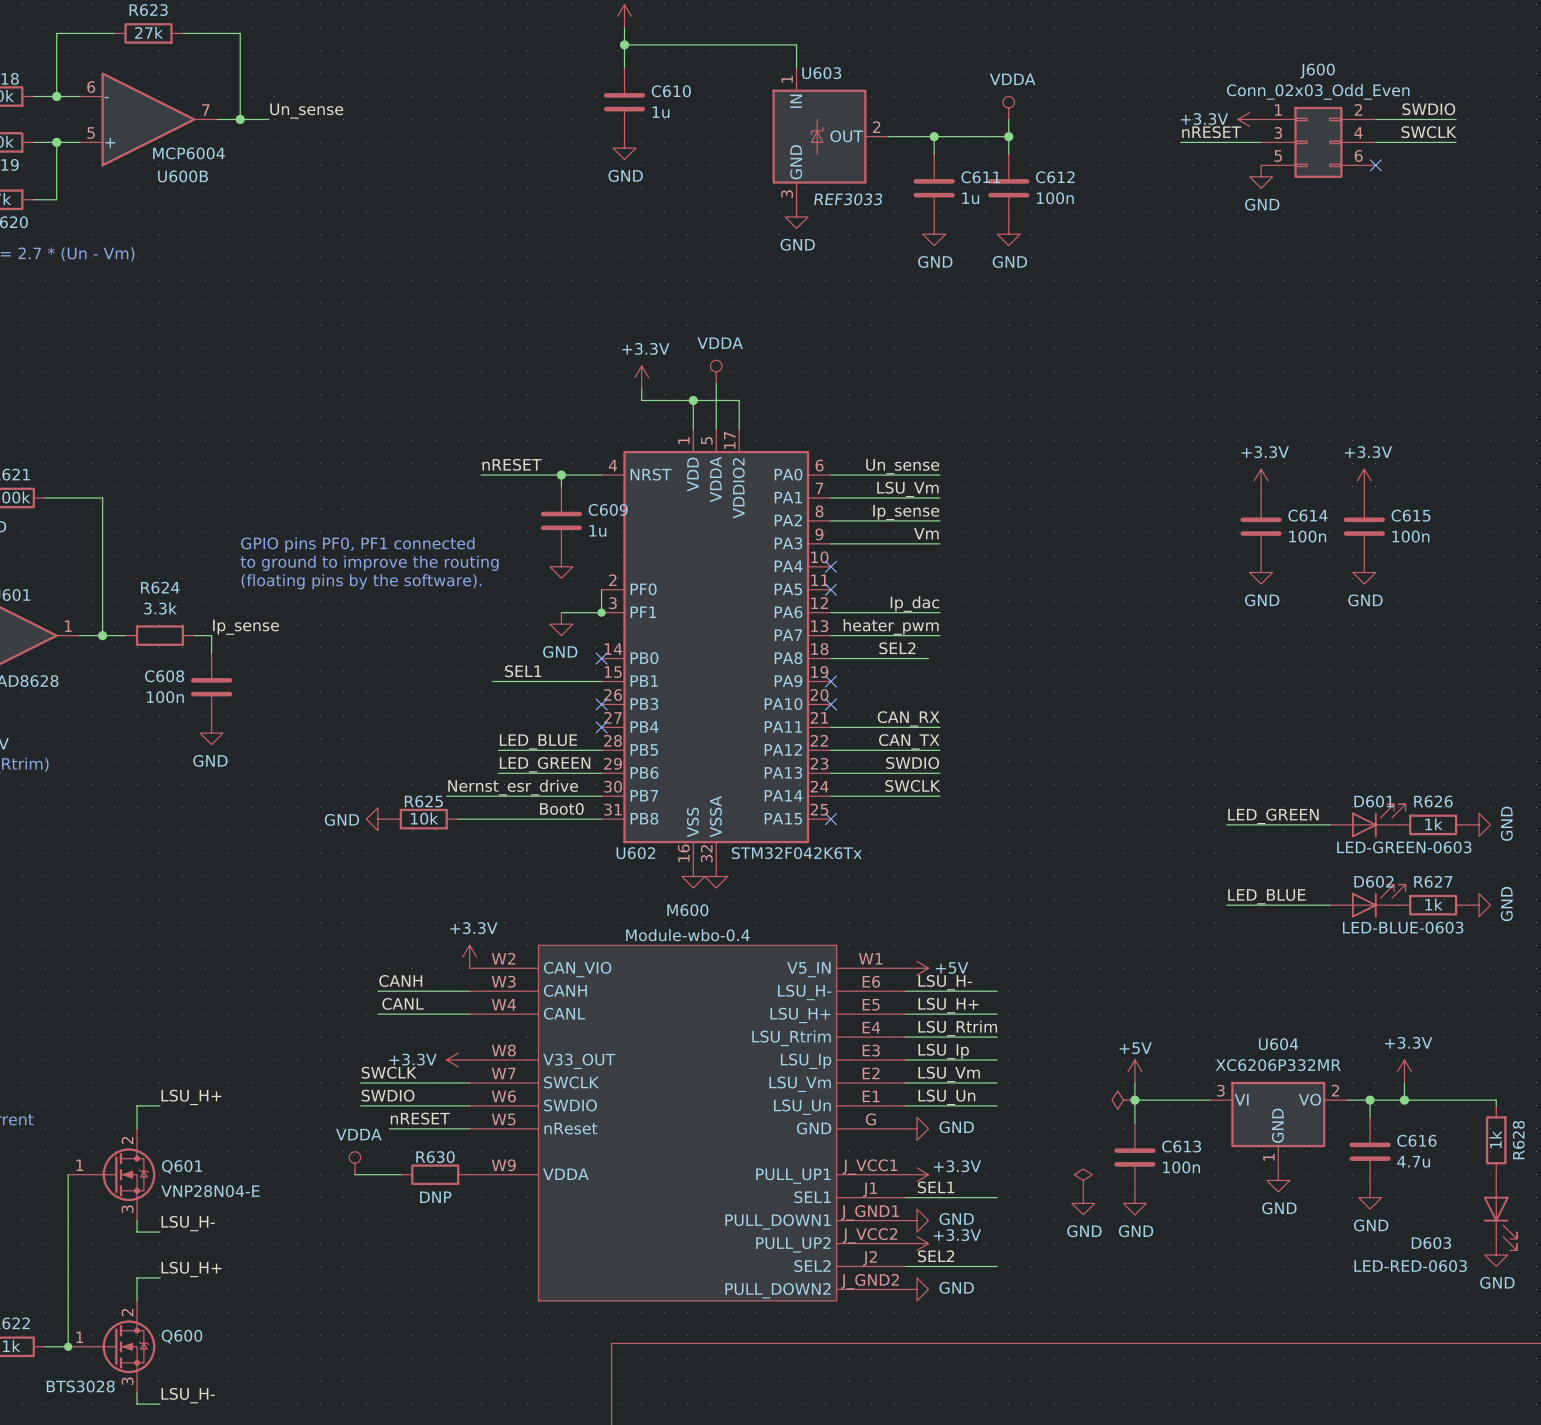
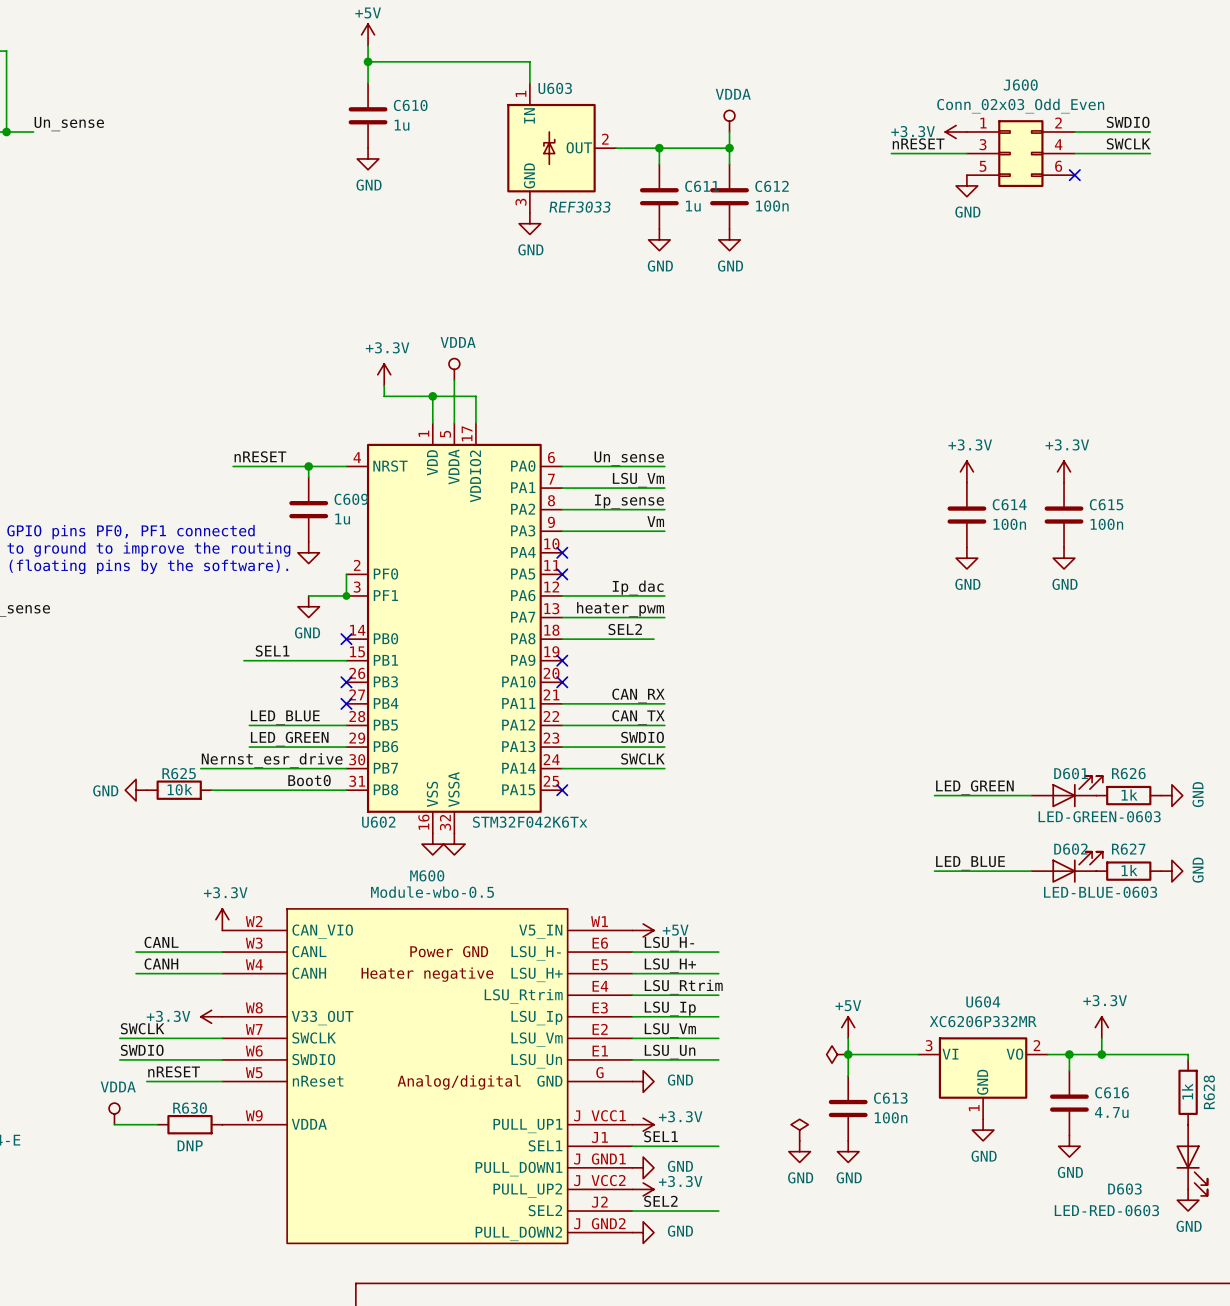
M600 value: Module-wbo-0.4 (687, 935) -> Module-wbo-0.5 (432, 892)
label: CANH (400, 980) -> CANL (161, 942)
M600 pin name: CANH (565, 990) -> CANL (309, 951)
M600 text: none -> Power GND (449, 951)
label: CANL (403, 1003) -> CANH (161, 964)
M600 pin name: CANL (564, 1013) -> CANH (309, 973)
M600 text: none -> Heater negative (427, 974)
M600 text: none -> Analog/digital (459, 1082)

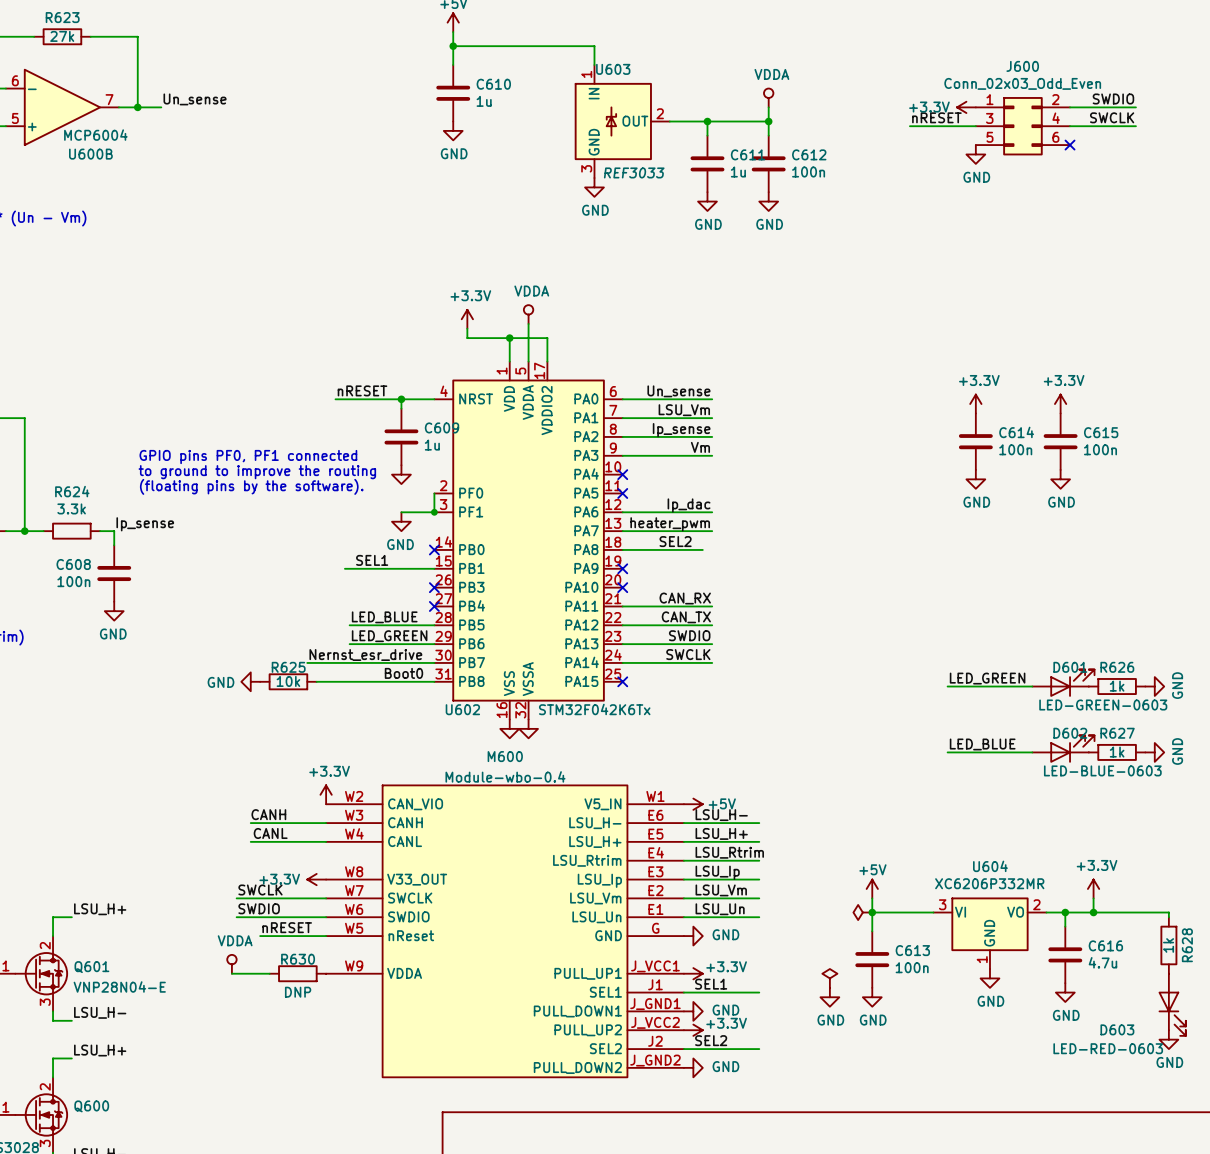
M600 value: Module-wbo-0.5 (432, 892) -> Module-wbo-0.4 (505, 776)
label: CANL (161, 942) -> CANH (268, 814)
M600 pin name: CANL (309, 951) -> CANH (405, 822)
M600 text: Power GND (449, 951) -> none
label: CANH (161, 964) -> CANL (270, 833)
M600 pin name: CANH (309, 973) -> CANL (405, 841)
M600 text: Heater negative (427, 974) -> none
M600 text: Analog/digital (459, 1082) -> none

